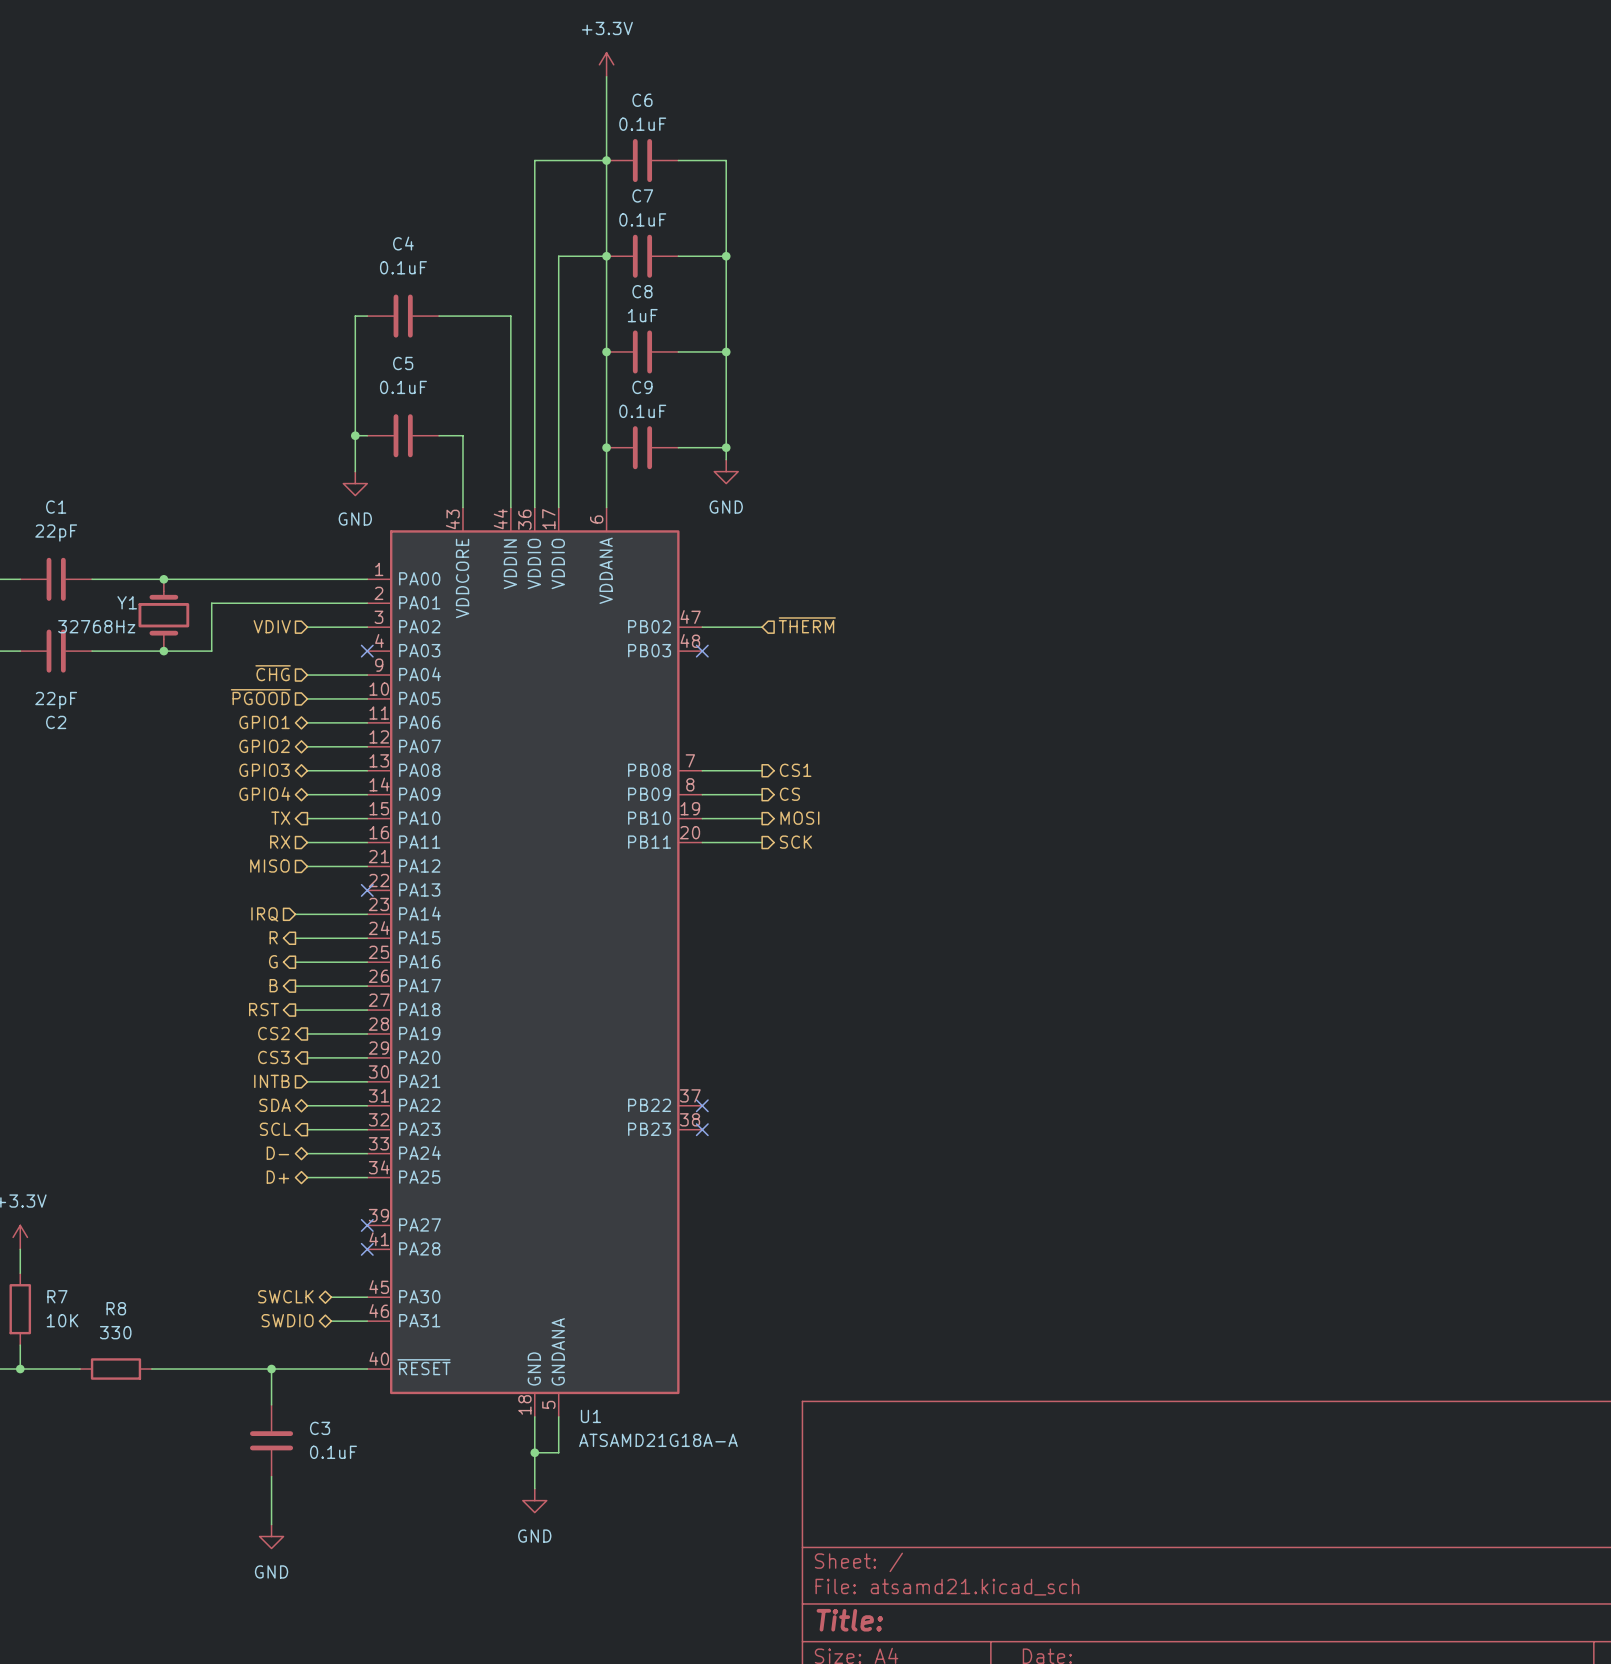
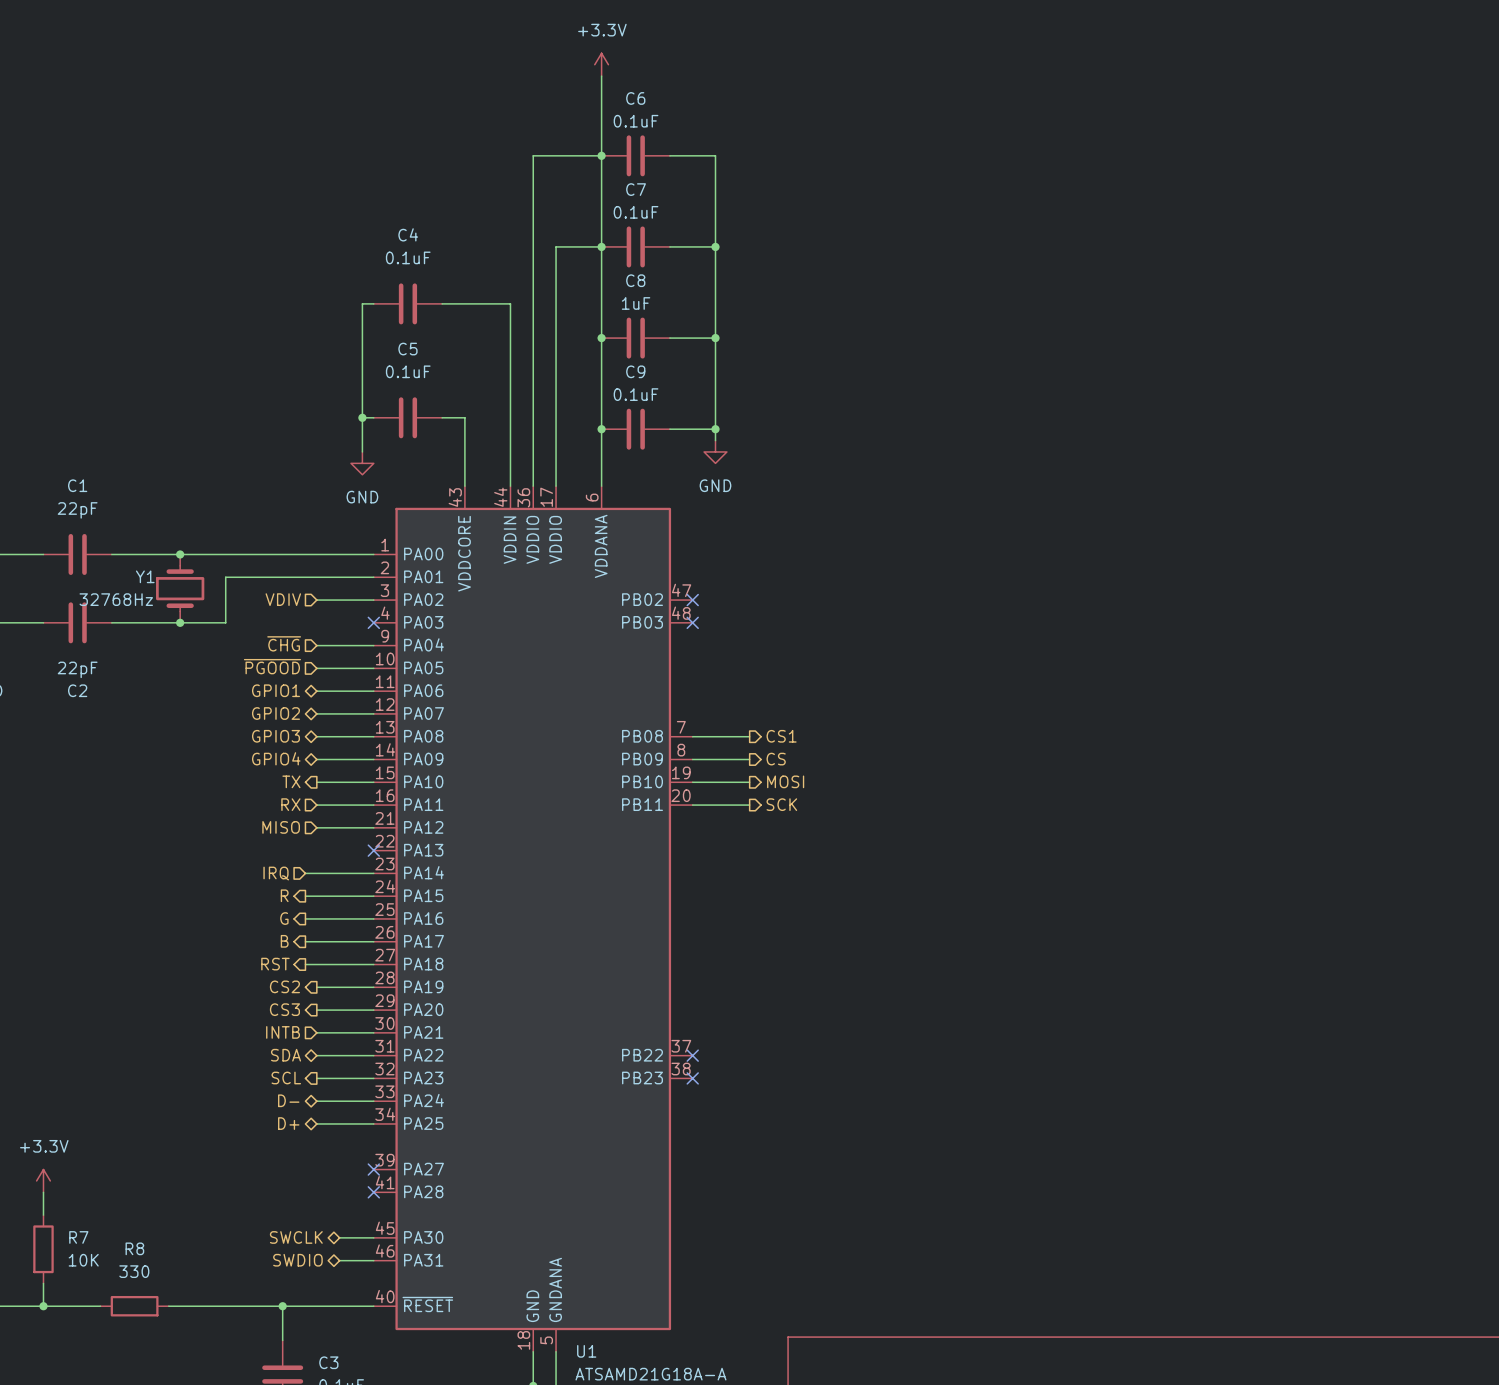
hierarchical label: ~{THERM} (807, 625) -> none
wire: (702, 627) (762, 627) -> none
no-connect mark: none -> (692, 600)

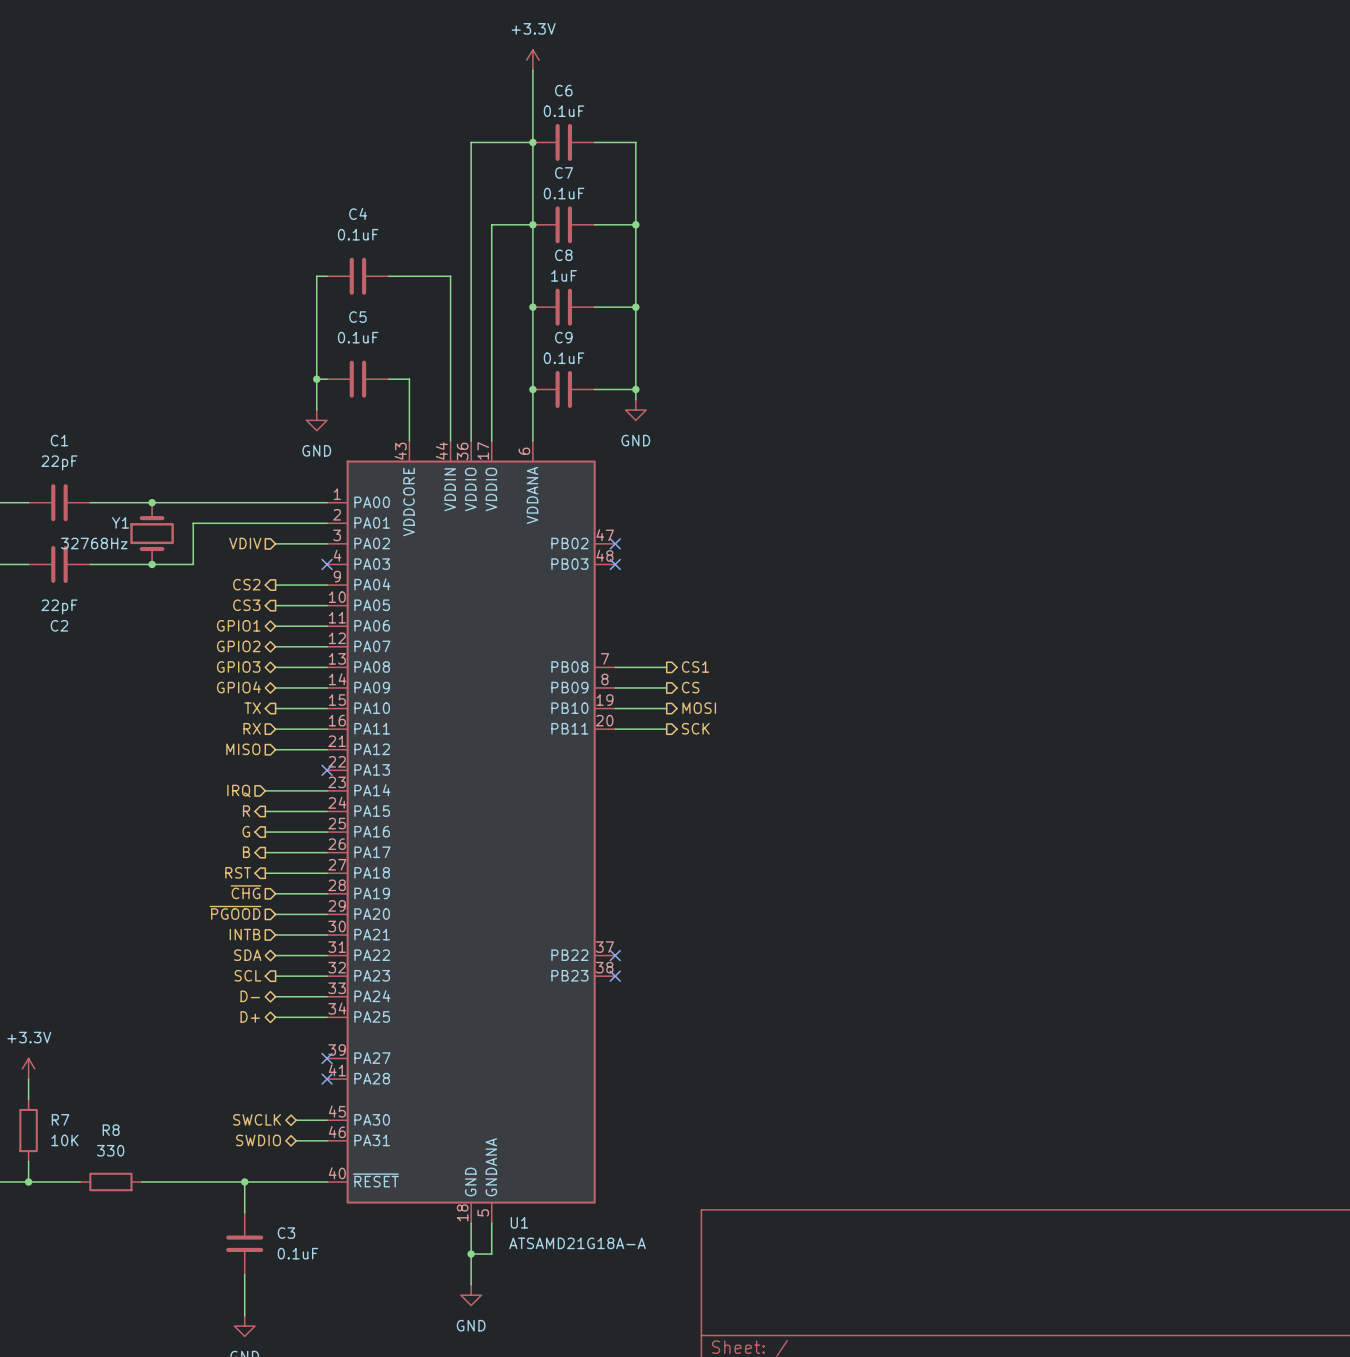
hierarchical label shape: input (284, 643) -> output (246, 584)
hierarchical label: ~{CHG} (284, 643) -> CS2 (246, 584)
hierarchical label shape: input (272, 666) -> output (246, 605)
hierarchical label: ~{PGOOD} (272, 666) -> CS3 (246, 605)
hierarchical label shape: output (284, 986) -> input (246, 892)
hierarchical label: CS2 (284, 986) -> ~{CHG} (246, 892)
hierarchical label shape: output (284, 1009) -> input (235, 912)
hierarchical label: CS3 (284, 1009) -> ~{PGOOD} (235, 912)

